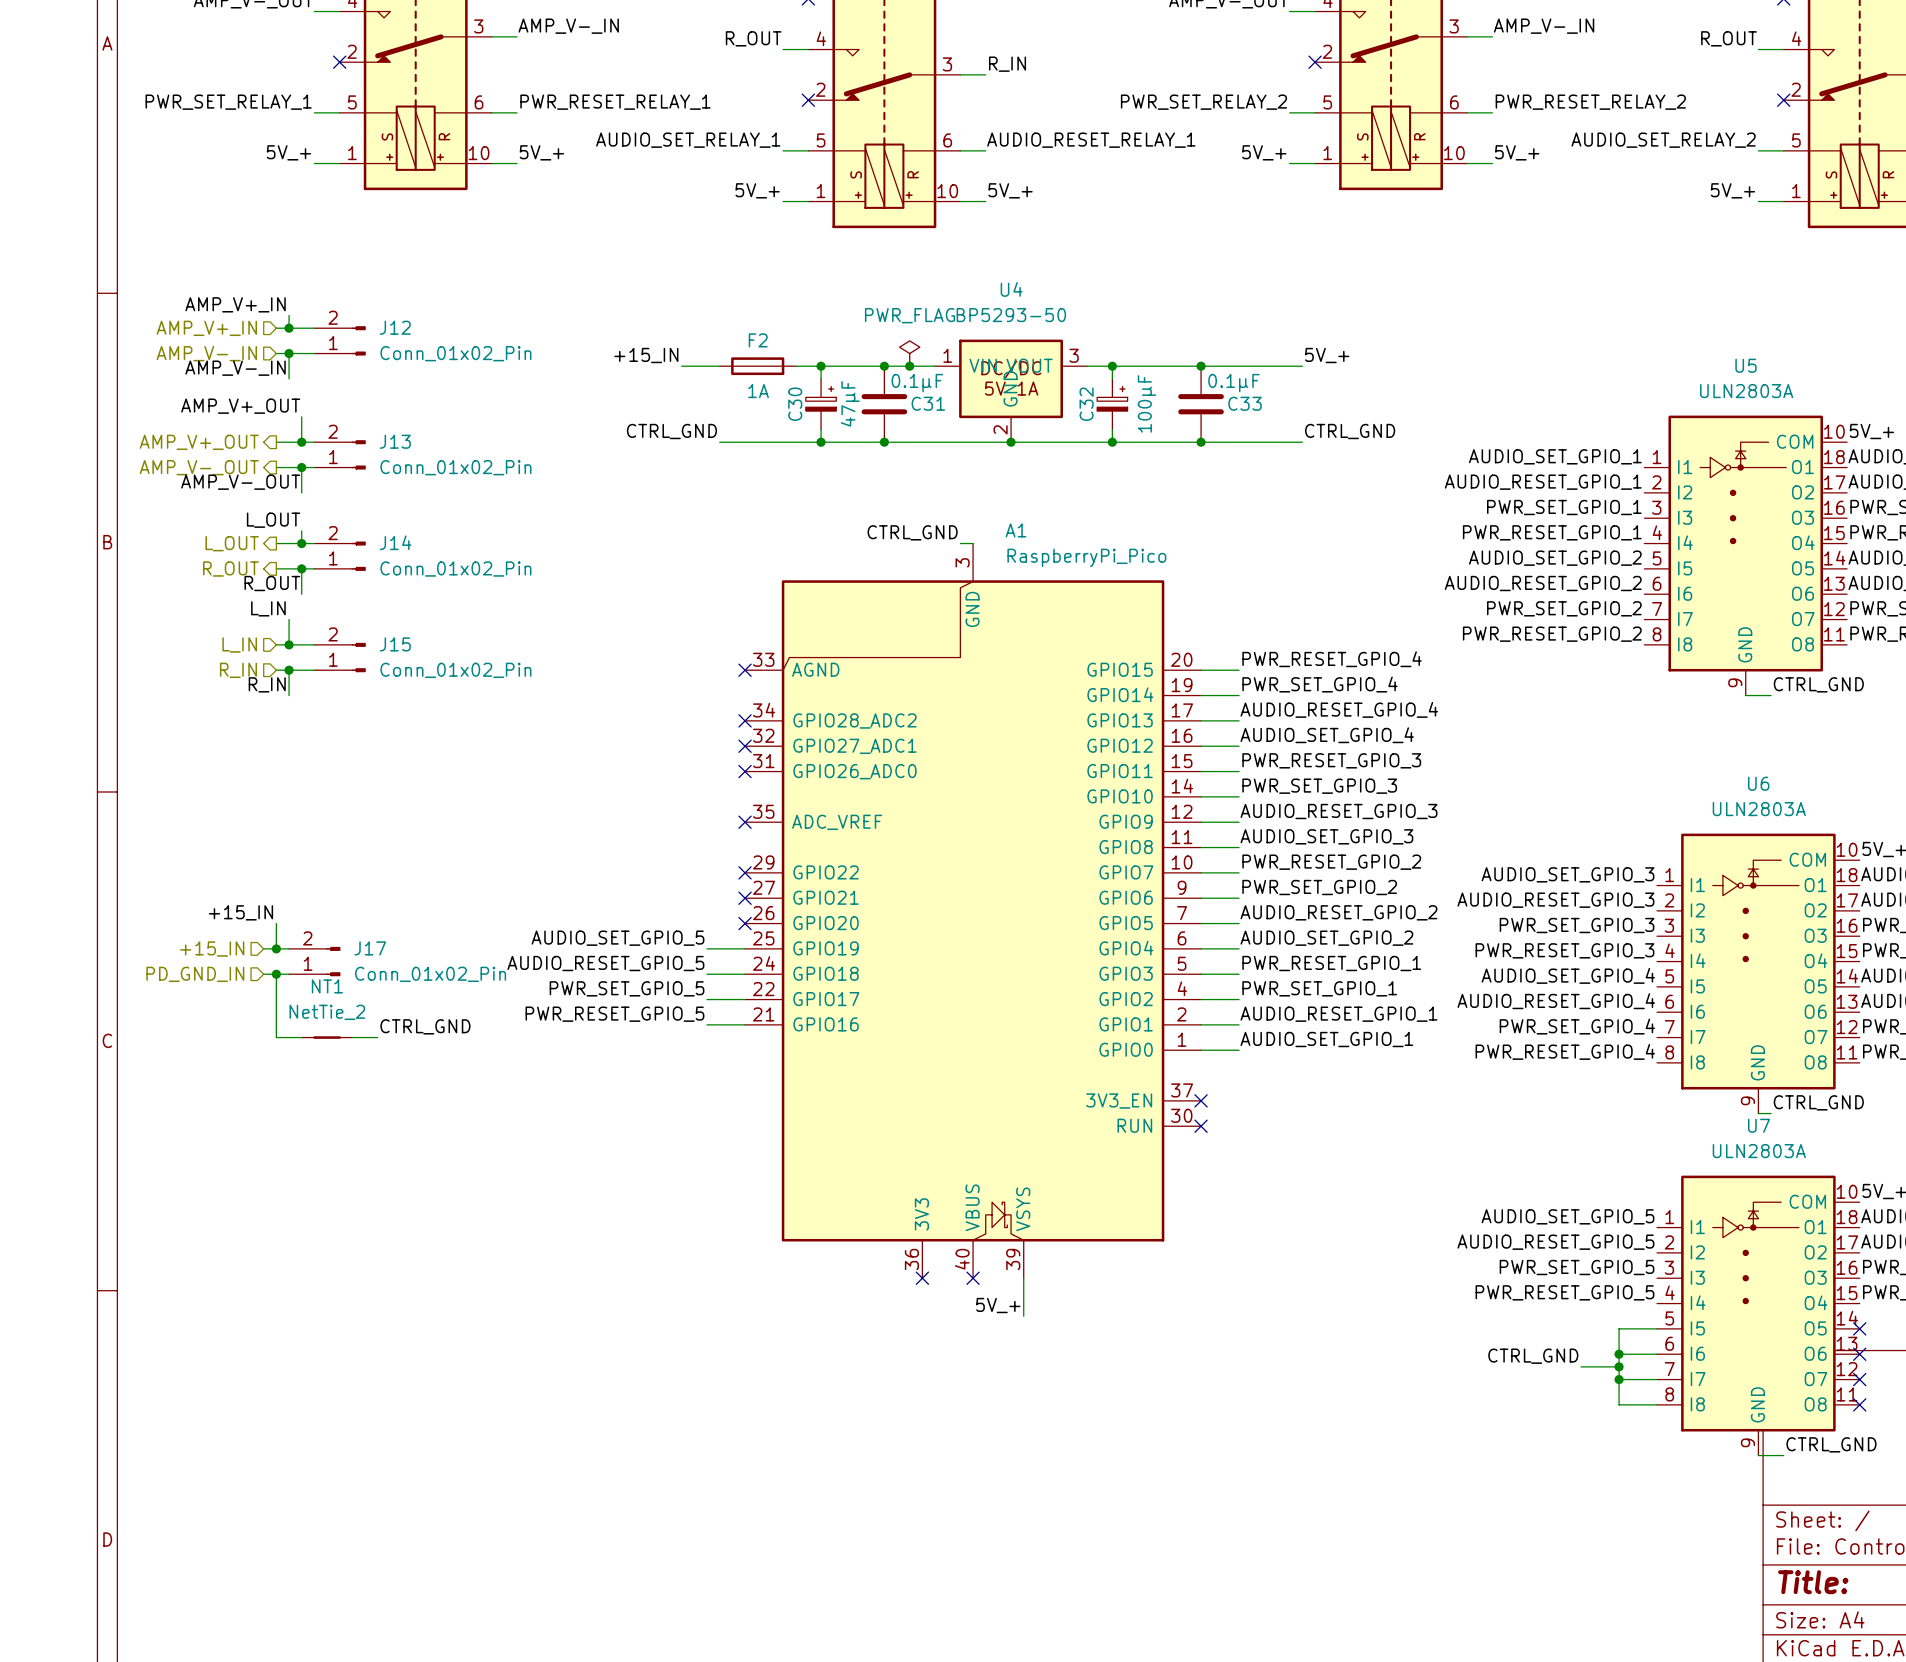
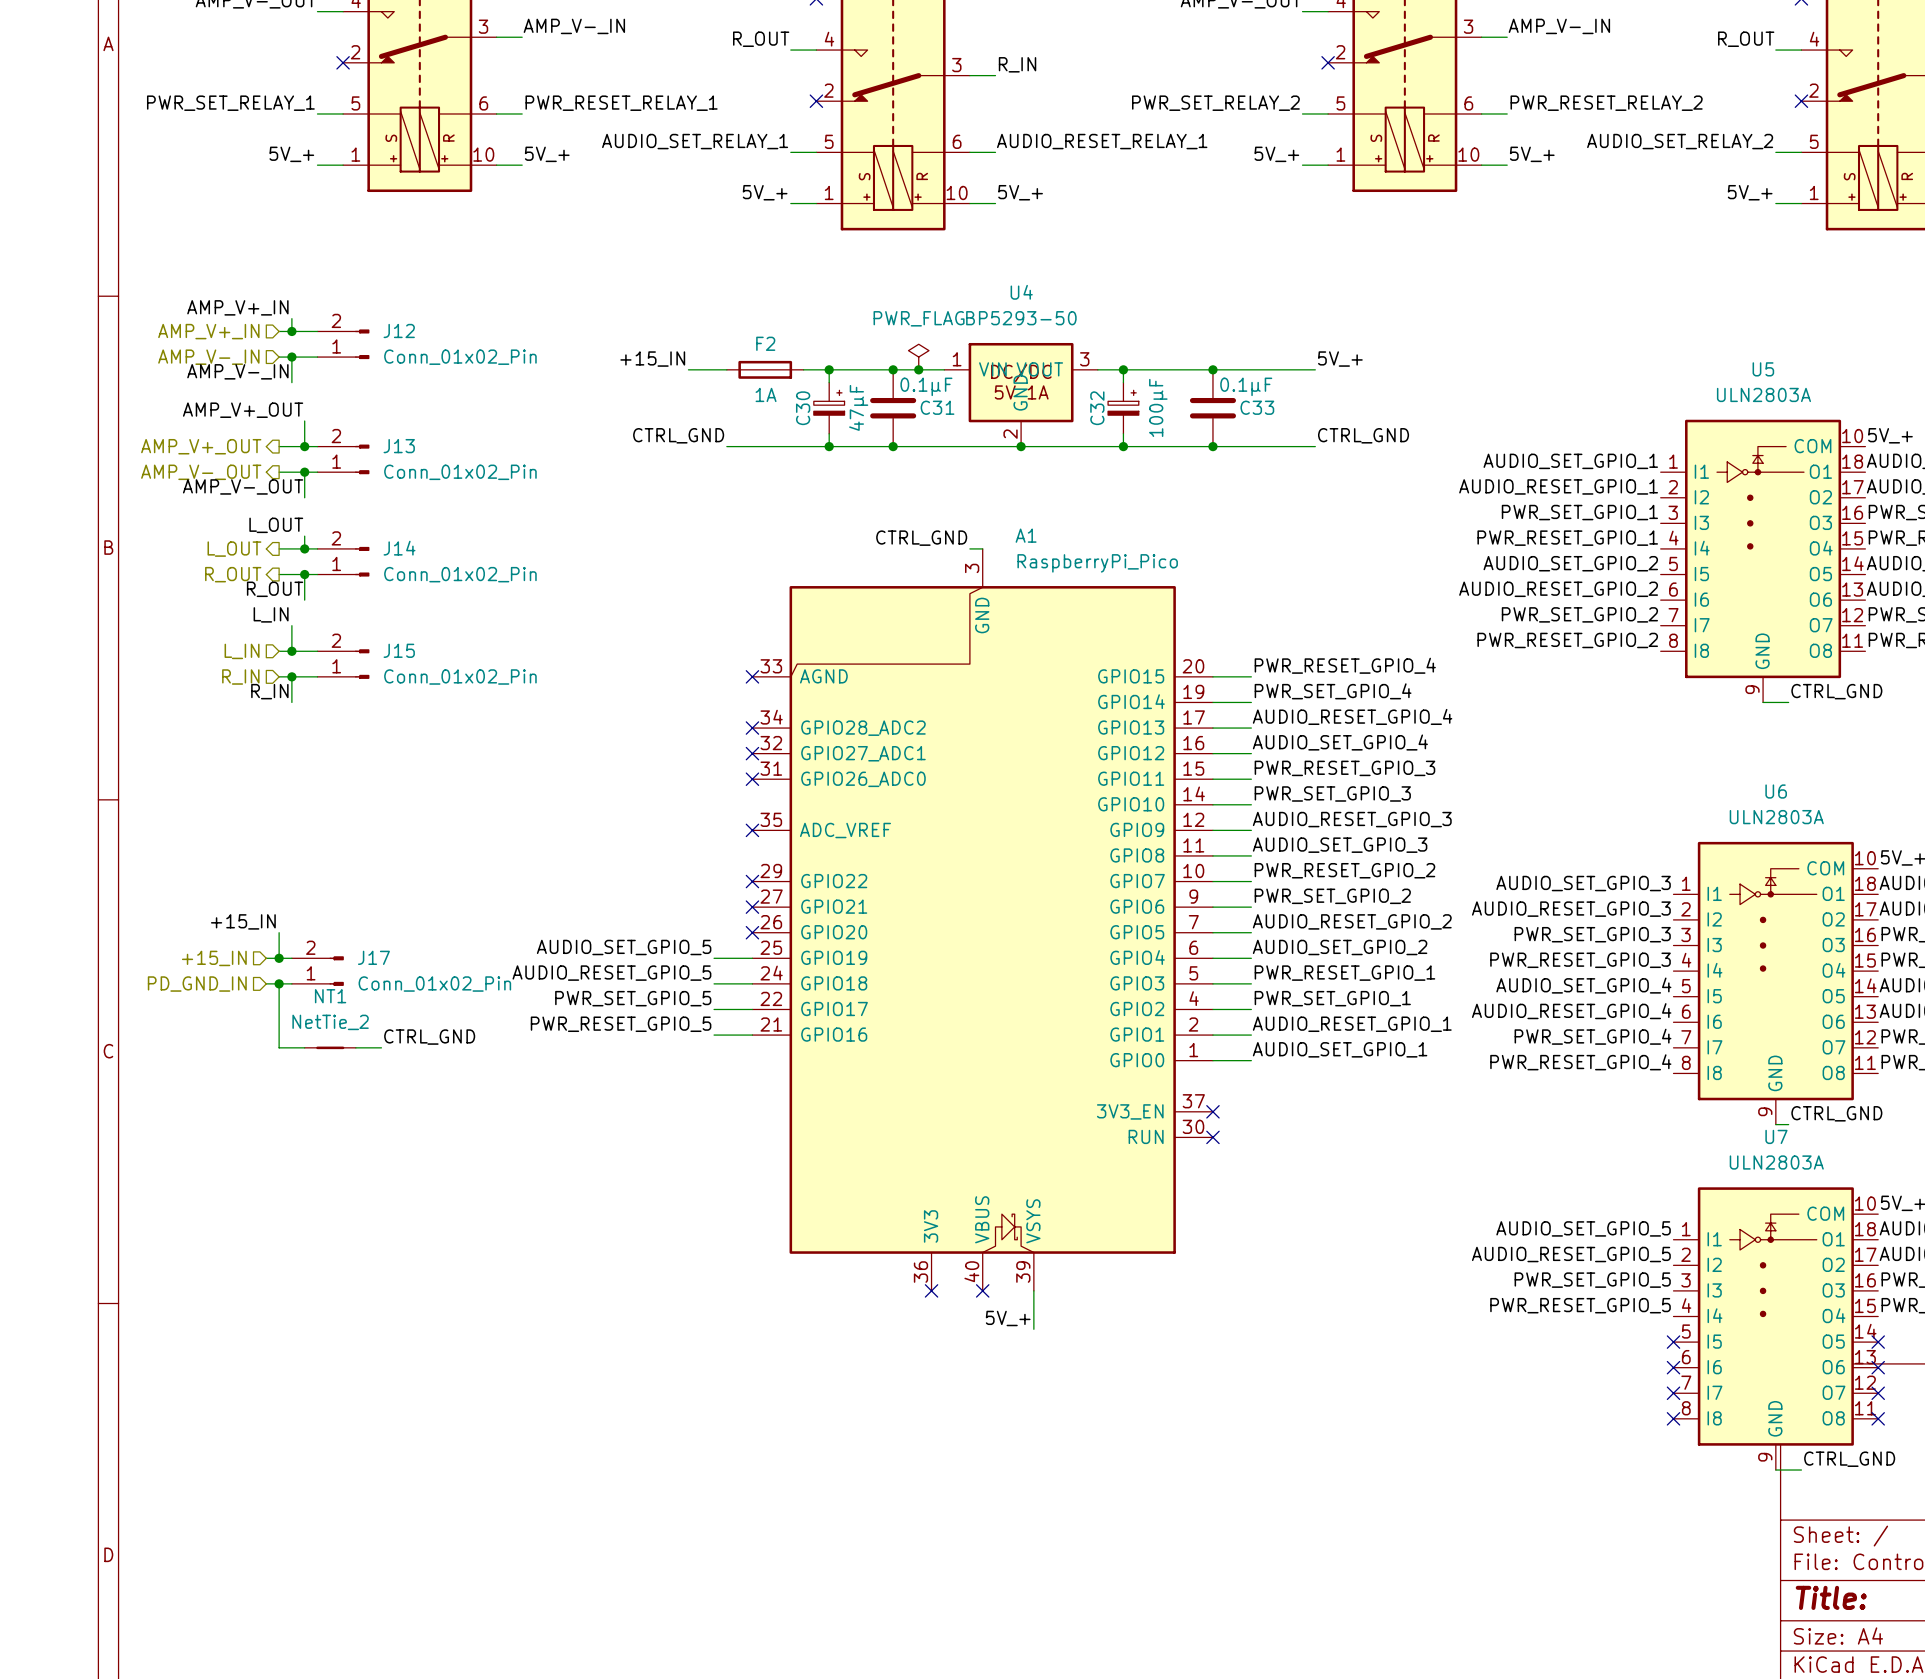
wire: (1657, 1328) (1619, 1328) (1619, 1404) (1657, 1404) -> none
no-connect mark: none -> (1673, 1342)
wire: (1619, 1354) (1657, 1354) -> none
junction: (1619, 1354) -> none
no-connect mark: none -> (1673, 1367)
label: CTRL_GND (1533, 1356) -> none
wire: (1581, 1366) (1619, 1366) -> none
junction: (1619, 1366) -> none
wire: (1619, 1379) (1657, 1379) -> none
junction: (1619, 1379) -> none
no-connect mark: none -> (1673, 1393)
no-connect mark: none -> (1673, 1418)

